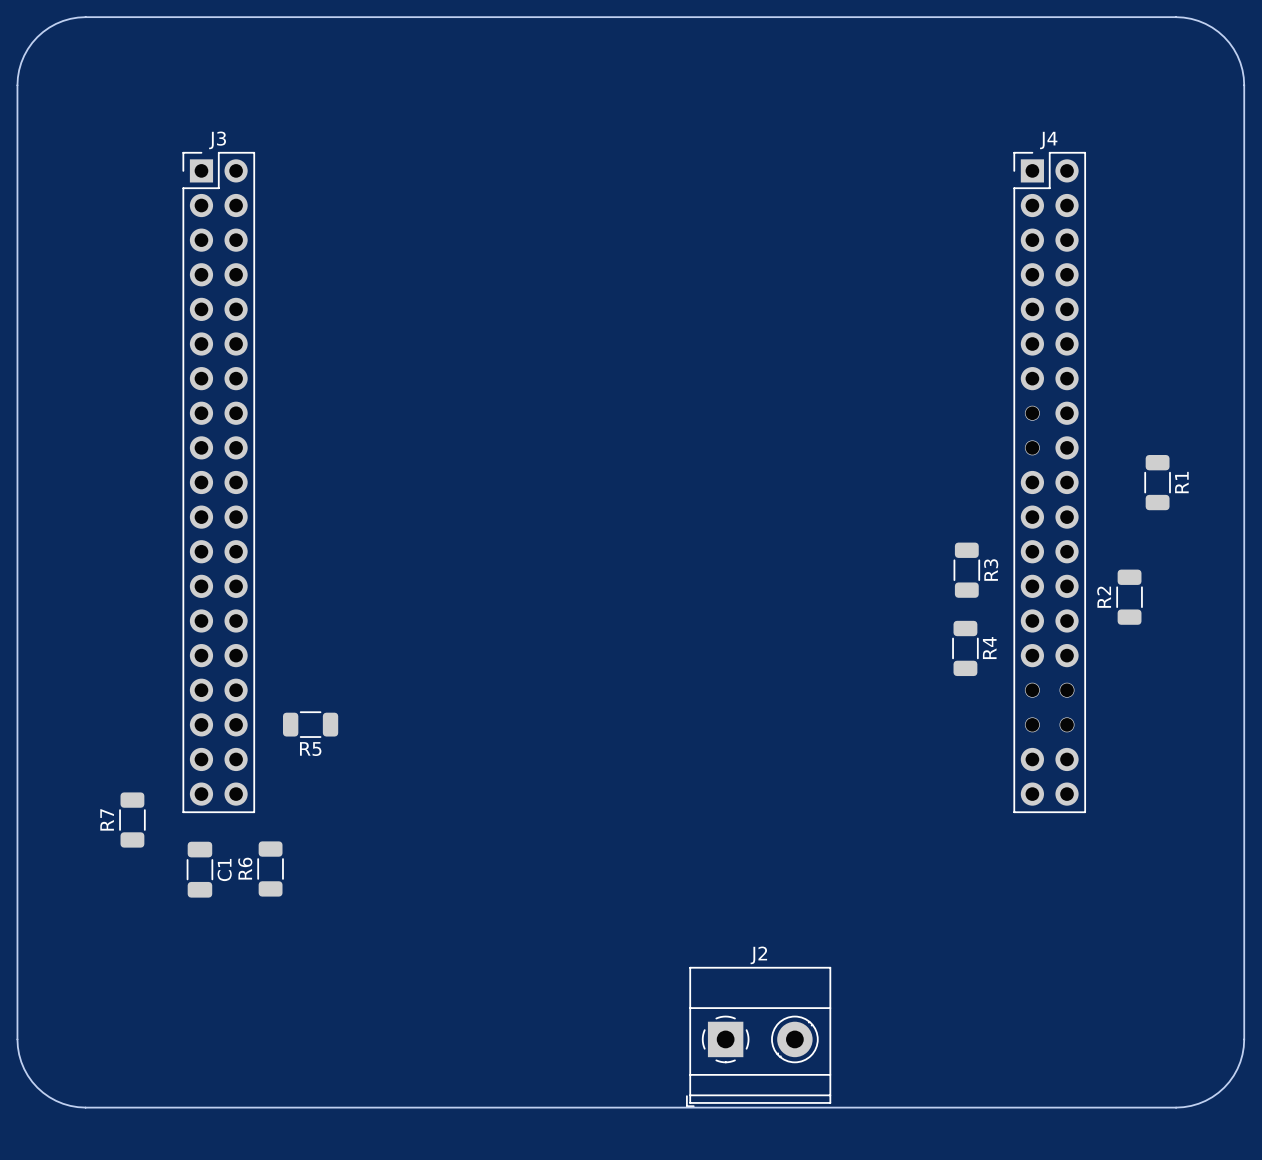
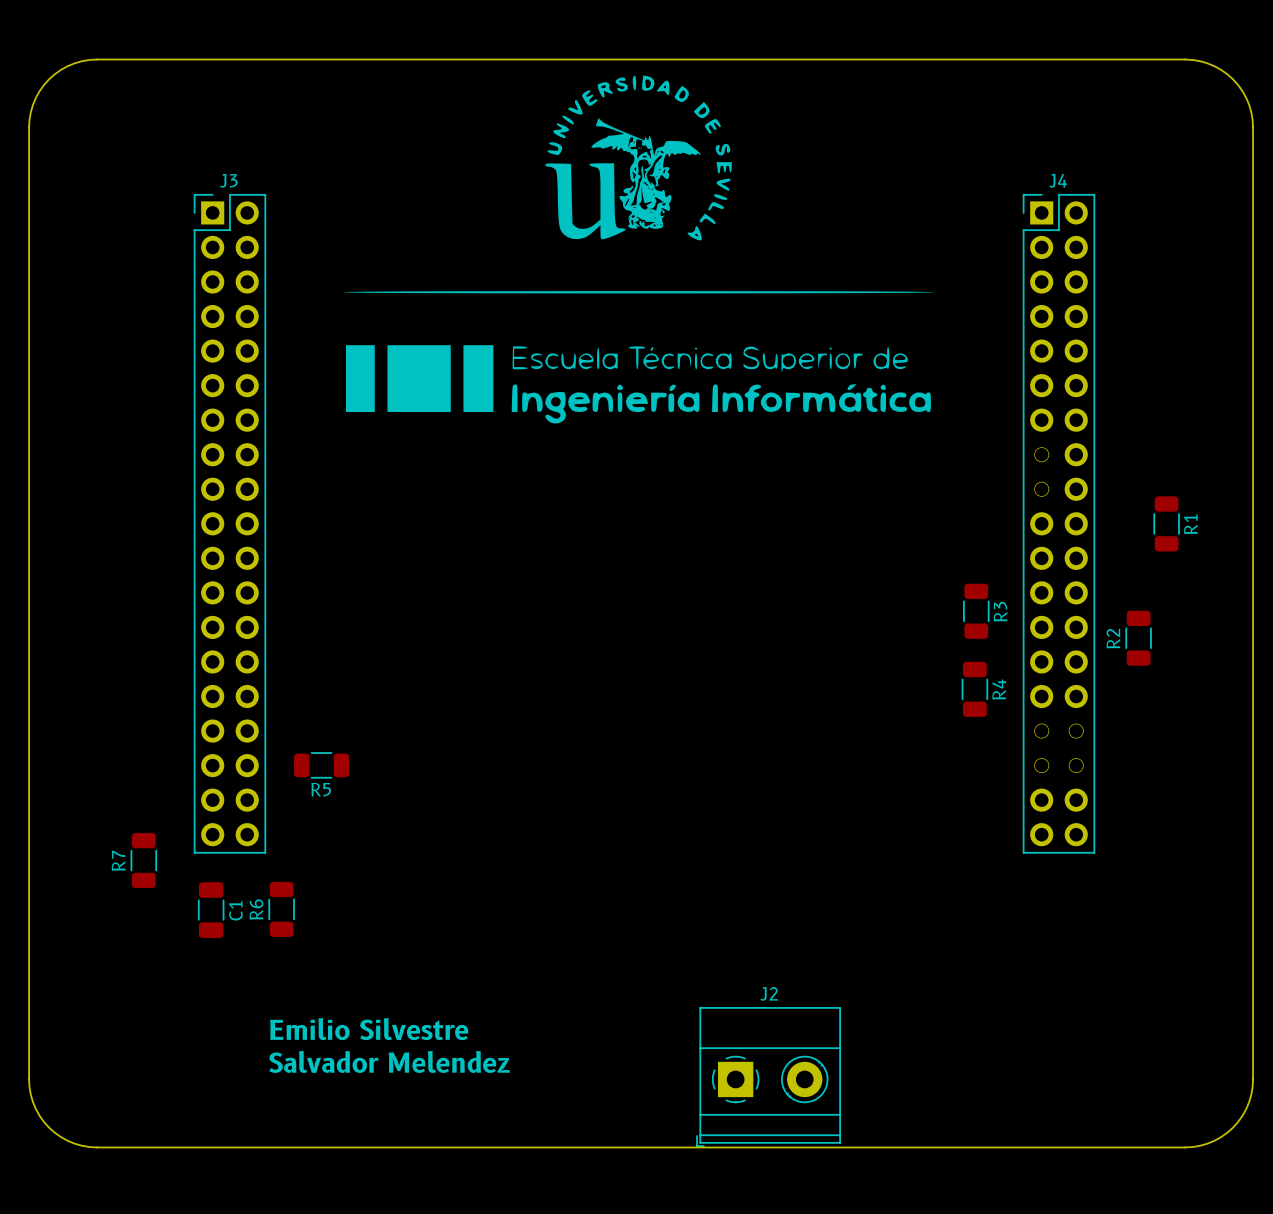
drawing: none -> [343, 75, 934, 424]
text: none -> Emilio Silvestre (369, 1029)
text: none -> Salvador Melendez (389, 1061)

